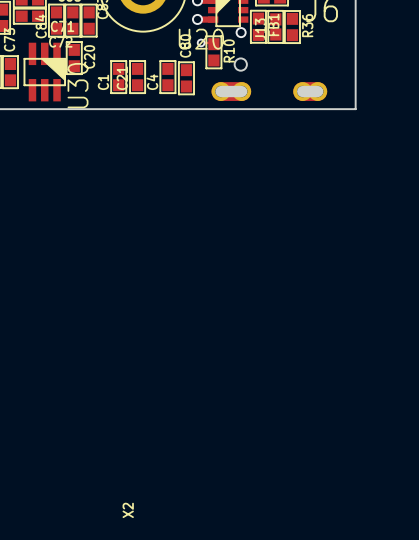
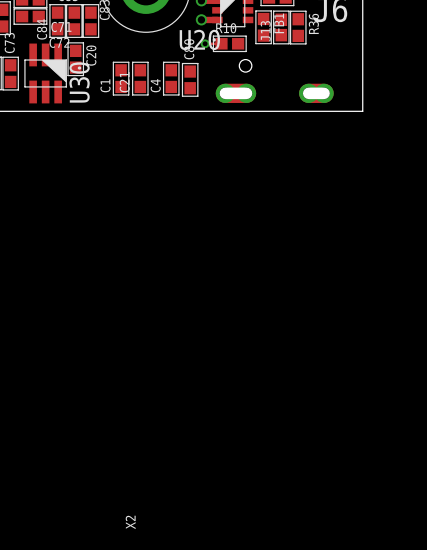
via: (241, 32) -> none
R10 rotation: 0° (213, 52) -> 90° clockwise (229, 43)

